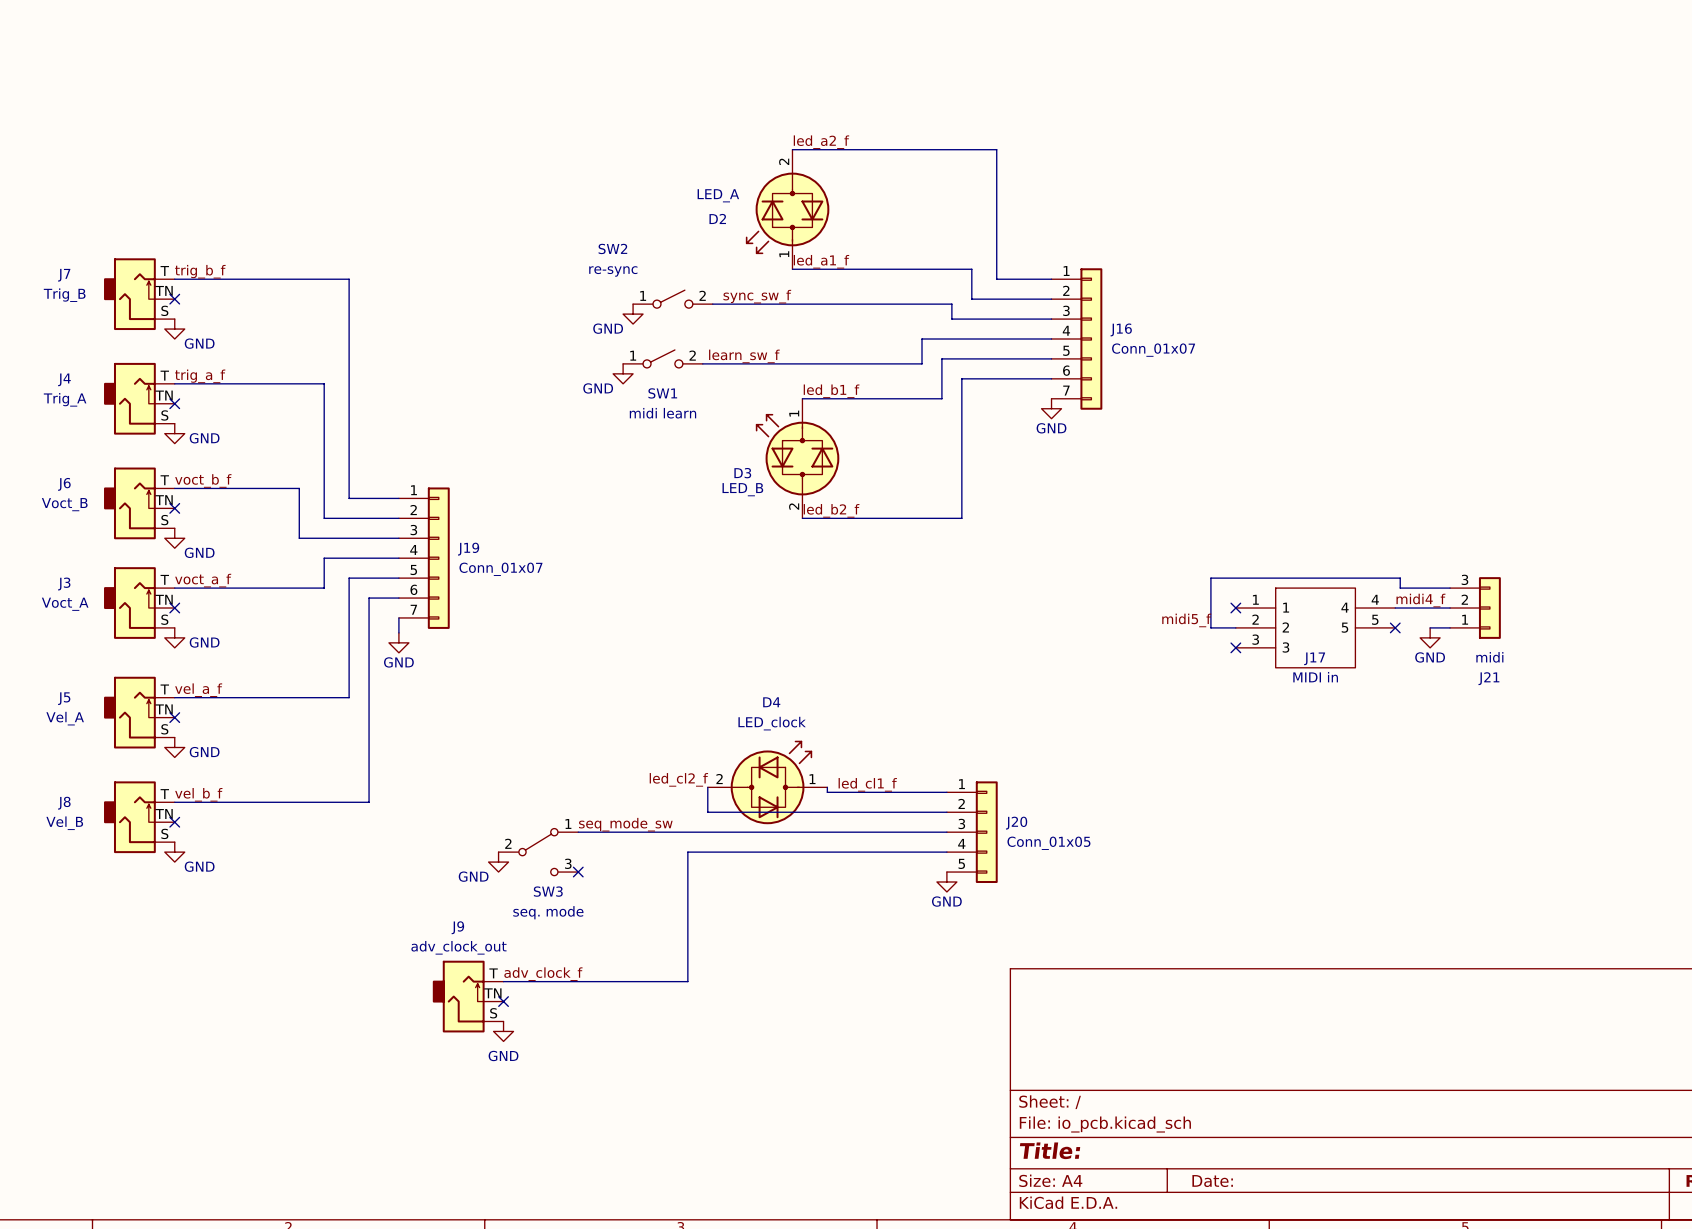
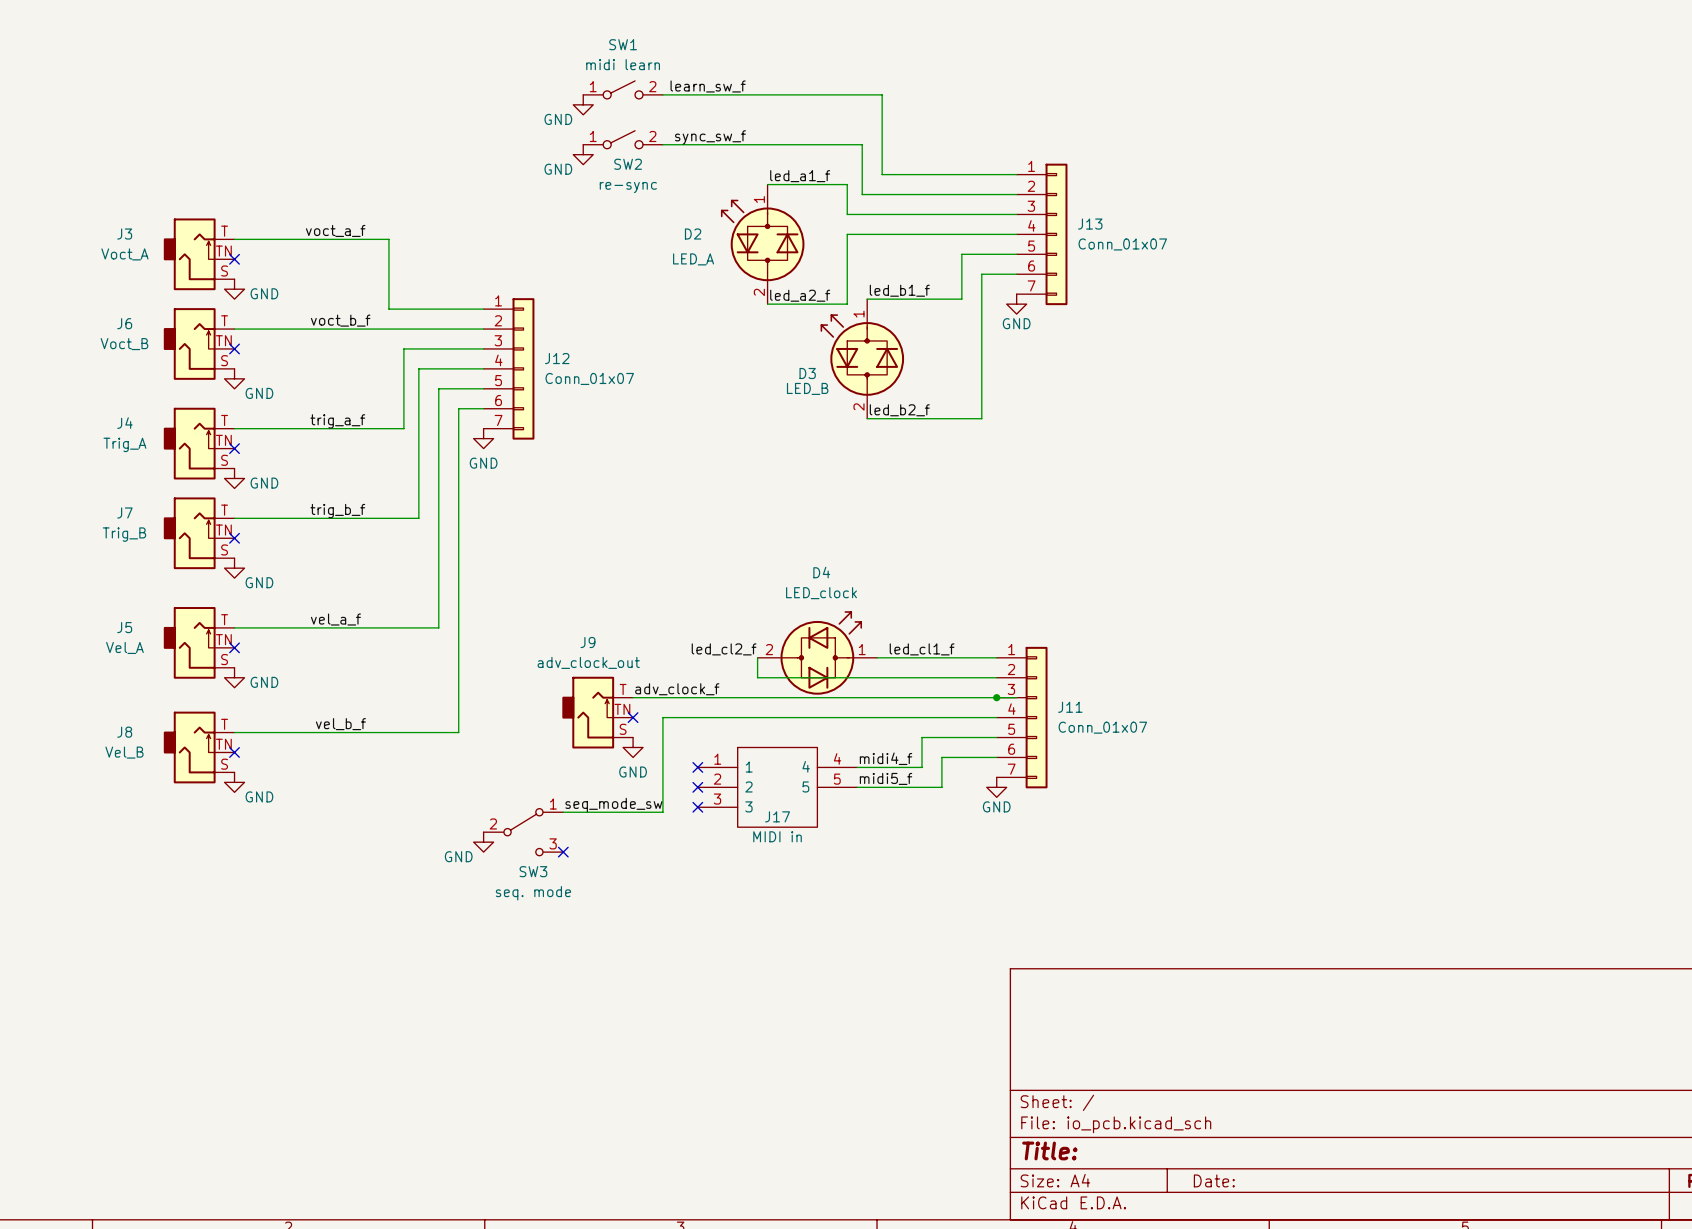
label: none -> learn_sw_f (708, 86)
wire: none -> (662, 94) (882, 94) (882, 174) (1016, 174)
power symbol: none -> GND (583, 104)
label position: led_a2_f (821, 142) -> led_a2_f (800, 295)
wire: none -> (662, 144) (862, 144) (862, 194) (1016, 194)
wire: (792, 149) (996, 149) (996, 279) (1051, 279) -> none
power symbol: none -> GND (583, 154)
wire: none -> (767, 184) (847, 184) (847, 214) (1016, 214)
D2 flip: as is (787, 213) -> up-down (762, 240)
label: none -> voct_a_f (335, 230)
J13: none -> Conn_01x07 (1042, 234)
wire: none -> (234, 239) (388, 239) (388, 309) (483, 309)
SW2 name position: SW2 (612, 248) -> SW2 (628, 164)
wire: none -> (1016, 254) (961, 254) (961, 299) (867, 299)
no-connect mark: none -> (234, 259)
label position: led_a1_f (821, 261) -> led_a1_f (800, 176)
wire: (792, 269) (971, 269) (971, 299) (1051, 299) -> none
label: trig_b_f (200, 271) -> none
SW2 value position: re-sync (613, 271) -> re-sync (628, 187)
wire: none -> (1016, 274) (981, 274) (981, 418) (867, 418)
wire: (174, 279) (349, 279) (349, 498) (398, 498) -> none
power symbol: none -> GND (234, 289)
J7 position: (139, 294) -> (199, 533)
label position: sync_sw_f (757, 296) -> sync_sw_f (710, 137)
no-connect mark: (174, 299) -> none
SW2 position: (672, 299) -> (623, 139)
wire: (712, 304) (767, 304) -> none
wire: (847, 304) (951, 304) (951, 319) (1051, 319) -> (847, 304) (847, 234) (1016, 234)
power symbol: GND (633, 314) -> none
label: none -> voct_b_f (340, 320)
power symbol: GND (174, 329) -> none
wire: none -> (234, 329) (483, 329)
wire: (1051, 339) (922, 339) (922, 363) (702, 363) -> none
J16: Conn_01x07 (1076, 339) -> none
no-connect mark: none -> (234, 348)
wire: none -> (483, 348) (403, 348) (403, 428) (234, 428)
label: learn_sw_f (744, 356) -> none
SW1 position: (662, 358) -> (623, 89)
wire: (1051, 358) (941, 358) (941, 398) (802, 398) -> none
wire: none -> (483, 368) (418, 368) (418, 518) (398, 518)
J12: none -> Conn_01x07 (509, 368)
power symbol: GND (623, 373) -> none
label position: trig_a_f (200, 376) -> trig_a_f (337, 421)
power symbol: none -> GND (234, 378)
wire: (1051, 378) (961, 378) (961, 518) (802, 518) -> none
wire: (174, 383) (324, 383) (324, 518) -> (234, 518) (324, 518)
wire: none -> (483, 388) (438, 388) (438, 627) (234, 627)
label position: led_b1_f (831, 391) -> led_b1_f (899, 290)
SW1 name position: SW1 (662, 393) -> SW1 (623, 44)
J4 position: (139, 398) -> (199, 443)
no-connect mark: (174, 403) -> none
wire: none -> (483, 408) (458, 408) (458, 732) (234, 732)
power symbol position: GND (1051, 408) -> GND (1016, 304)
SW1 value position: midi learn (662, 413) -> midi learn (623, 64)
power symbol: GND (174, 433) -> none
power symbol: none -> GND (483, 438)
no-connect mark: none -> (234, 448)
D3 position: (797, 458) -> (862, 358)
power symbol: none -> GND (234, 478)
label: voct_b_f (203, 480) -> none
wire: (174, 488) (299, 488) (299, 538) (398, 538) -> none
J6 position: (139, 503) -> (199, 343)
no-connect mark: (174, 508) -> none
label: none -> trig_b_f (337, 511)
label position: led_b2_f (831, 510) -> led_b2_f (899, 410)
power symbol: GND (174, 538) -> none
no-connect mark: none -> (234, 538)
wire: (398, 558) (324, 558) (324, 588) (174, 588) -> none
J19: Conn_01x07 (424, 558) -> none
power symbol: none -> GND (234, 568)
wire: (398, 578) (349, 578) (349, 697) (174, 697) -> none
label: voct_a_f (203, 580) -> none
wire: (1450, 588) (1400, 588) (1400, 578) (1210, 578) (1210, 627) (1235, 627) -> none
wire: (398, 598) (369, 598) (369, 802) (174, 802) -> none
label: midi4_f (1420, 600) -> none
J3 position: (139, 603) -> (199, 254)
no-connect mark: (174, 608) -> none
no-connect mark: (1235, 608) -> none
wire: (1395, 608) (1450, 608) -> none
J21: midi (1475, 608) -> none
wire: (398, 617) (398, 632) -> none
label: midi5_f (1186, 620) -> none
J17 position: (1315, 627) -> (777, 787)
no-connect mark: (1395, 627) -> none
wire: (1430, 627) (1450, 627) -> none
power symbol: GND (174, 637) -> none
power symbol: GND (1430, 637) -> none
power symbol: GND (398, 642) -> none
no-connect mark: none -> (234, 647)
no-connect mark: (1235, 647) -> none
wire: none -> (757, 657) (757, 677) (996, 677)
wire: none -> (877, 657) (996, 657)
power symbol: none -> GND (234, 677)
label position: vel_a_f (198, 690) -> vel_a_f (335, 619)
label: none -> adv_clock_f (677, 689)
wire: none -> (633, 697) (1016, 697)
junction: none -> (996, 697)
J5 position: (139, 712) -> (199, 642)
no-connect mark: (174, 717) -> none
no-connect mark: none -> (633, 717)
wire: none -> (996, 717) (662, 717) (662, 812) (563, 812)
J11: none -> Conn_01x07 (1022, 717)
wire: none -> (996, 737) (922, 737) (922, 767) (857, 767)
power symbol: GND (174, 747) -> none
power symbol: none -> GND (633, 747)
no-connect mark: none -> (234, 752)
wire: none -> (996, 757) (941, 757) (941, 787) (857, 787)
label: none -> midi4_f (886, 758)
no-connect mark: none -> (697, 767)
label position: led_cl2_f (678, 779) -> led_cl2_f (724, 649)
label: none -> midi5_f (886, 778)
power symbol: none -> GND (234, 782)
D4 position: (767, 782) -> (817, 652)
label position: led_cl1_f (867, 784) -> led_cl1_f (922, 649)
no-connect mark: none -> (697, 787)
wire: (707, 787) (707, 812) (946, 812) -> none
wire: (827, 787) (827, 792) (946, 792) -> none
label position: vel_b_f (198, 794) -> vel_b_f (340, 724)
no-connect mark: none -> (697, 807)
J8 position: (139, 817) -> (199, 747)
no-connect mark: (174, 822) -> none
label position: seq_mode_sw (625, 824) -> seq_mode_sw (613, 805)
wire: (578, 832) (946, 832) -> none
J20: Conn_01x05 (972, 832) -> none
power symbol: GND (174, 852) -> none
SW3 position: (538, 852) -> (523, 832)
wire: (946, 852) (687, 852) (687, 981) (503, 981) -> none
power symbol position: GND (498, 862) -> GND (483, 842)
no-connect mark position: (578, 872) -> (563, 852)
power symbol position: GND (946, 881) -> GND (996, 787)
label: adv_clock_f (543, 974) -> none
J9 position: (468, 996) -> (597, 712)
no-connect mark: (503, 1001) -> none
power symbol: GND (503, 1031) -> none

